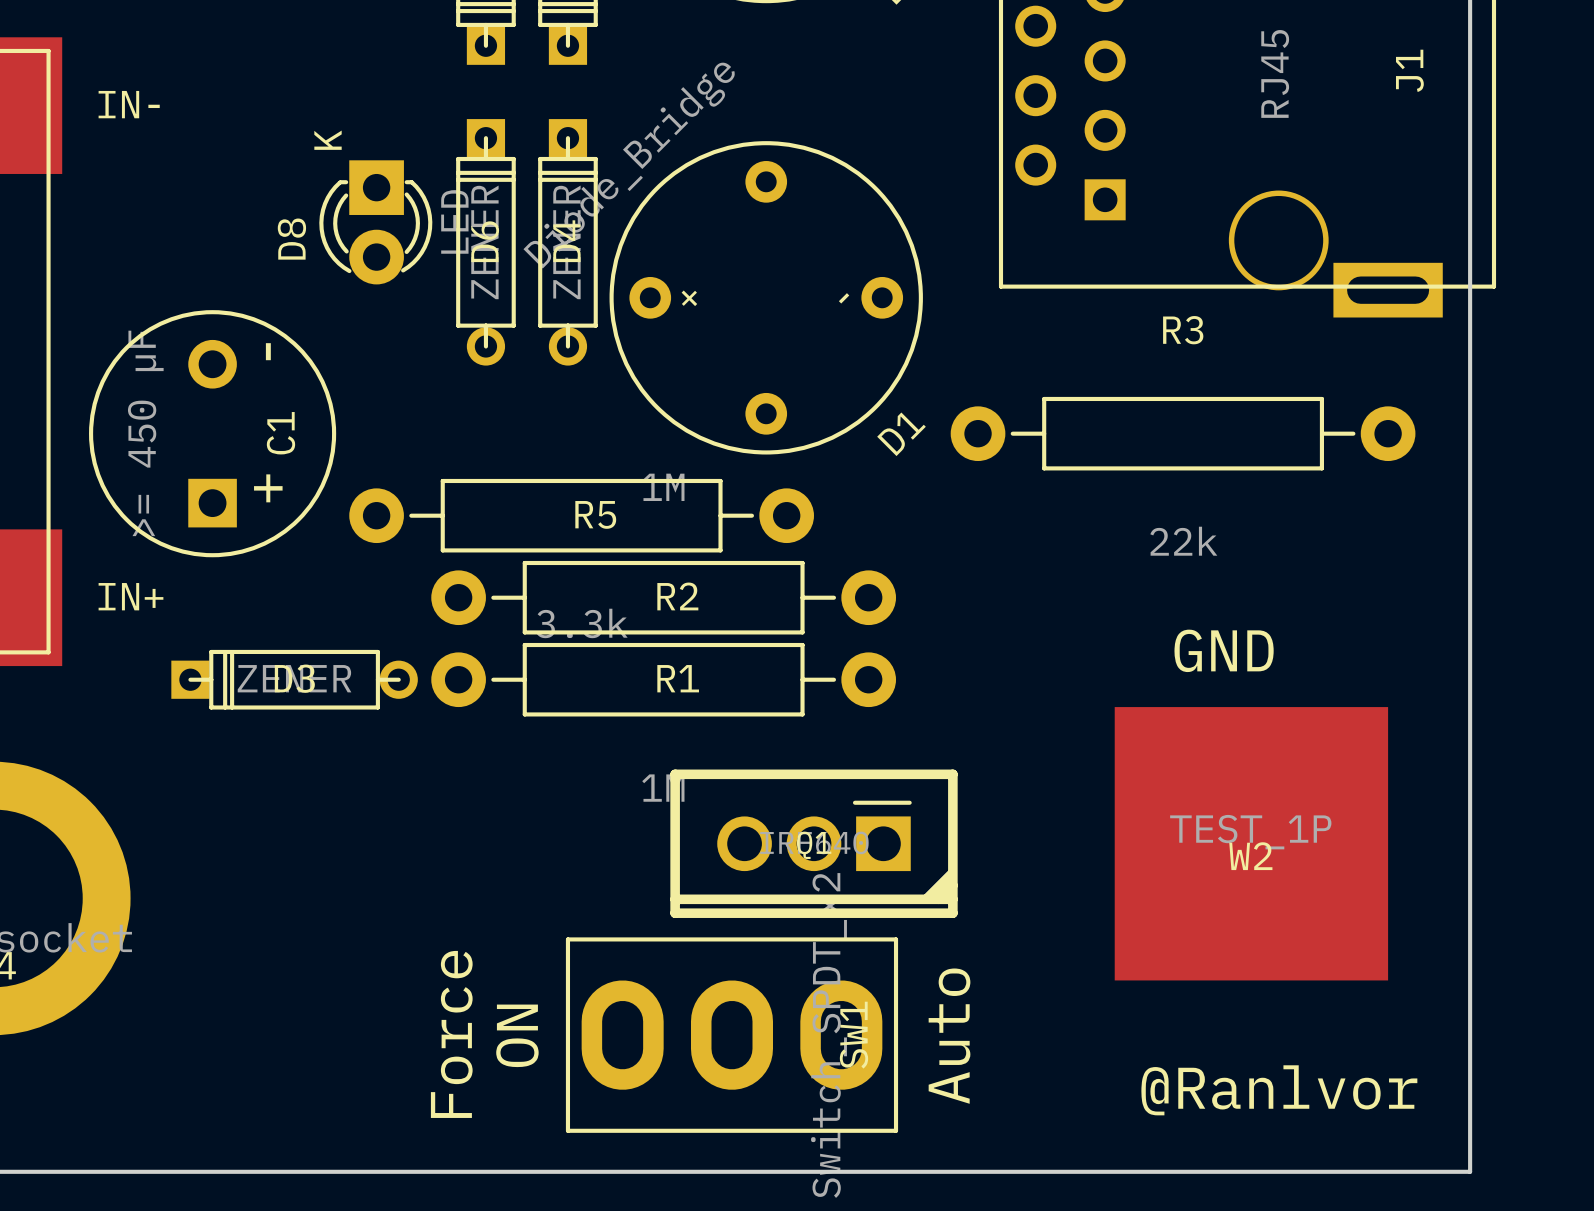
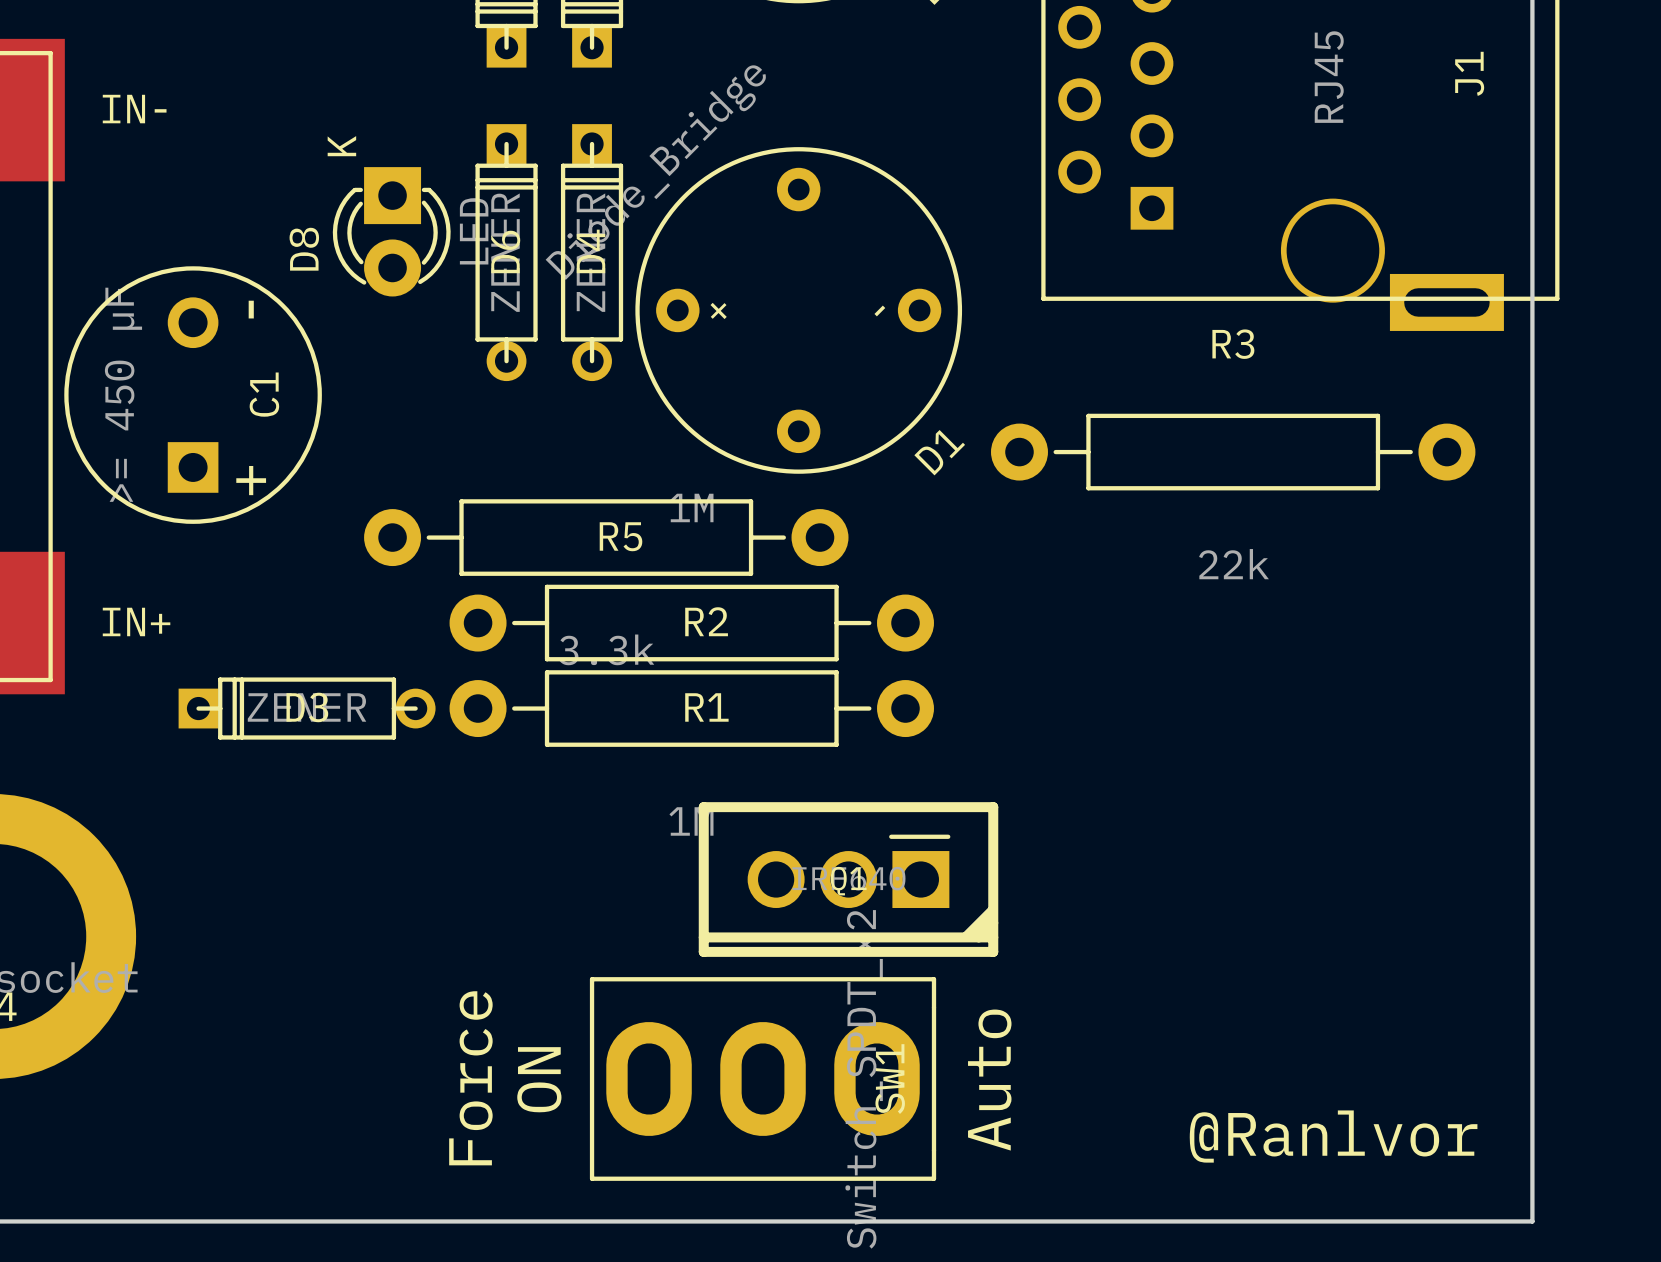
text position: - (268, 351) -> - (251, 309)
C1 position: (212, 433) -> (193, 395)
text position: + (268, 488) -> + (251, 480)
text: GND (1224, 650) -> none
W2: TEST_1P (1251, 843) -> none

